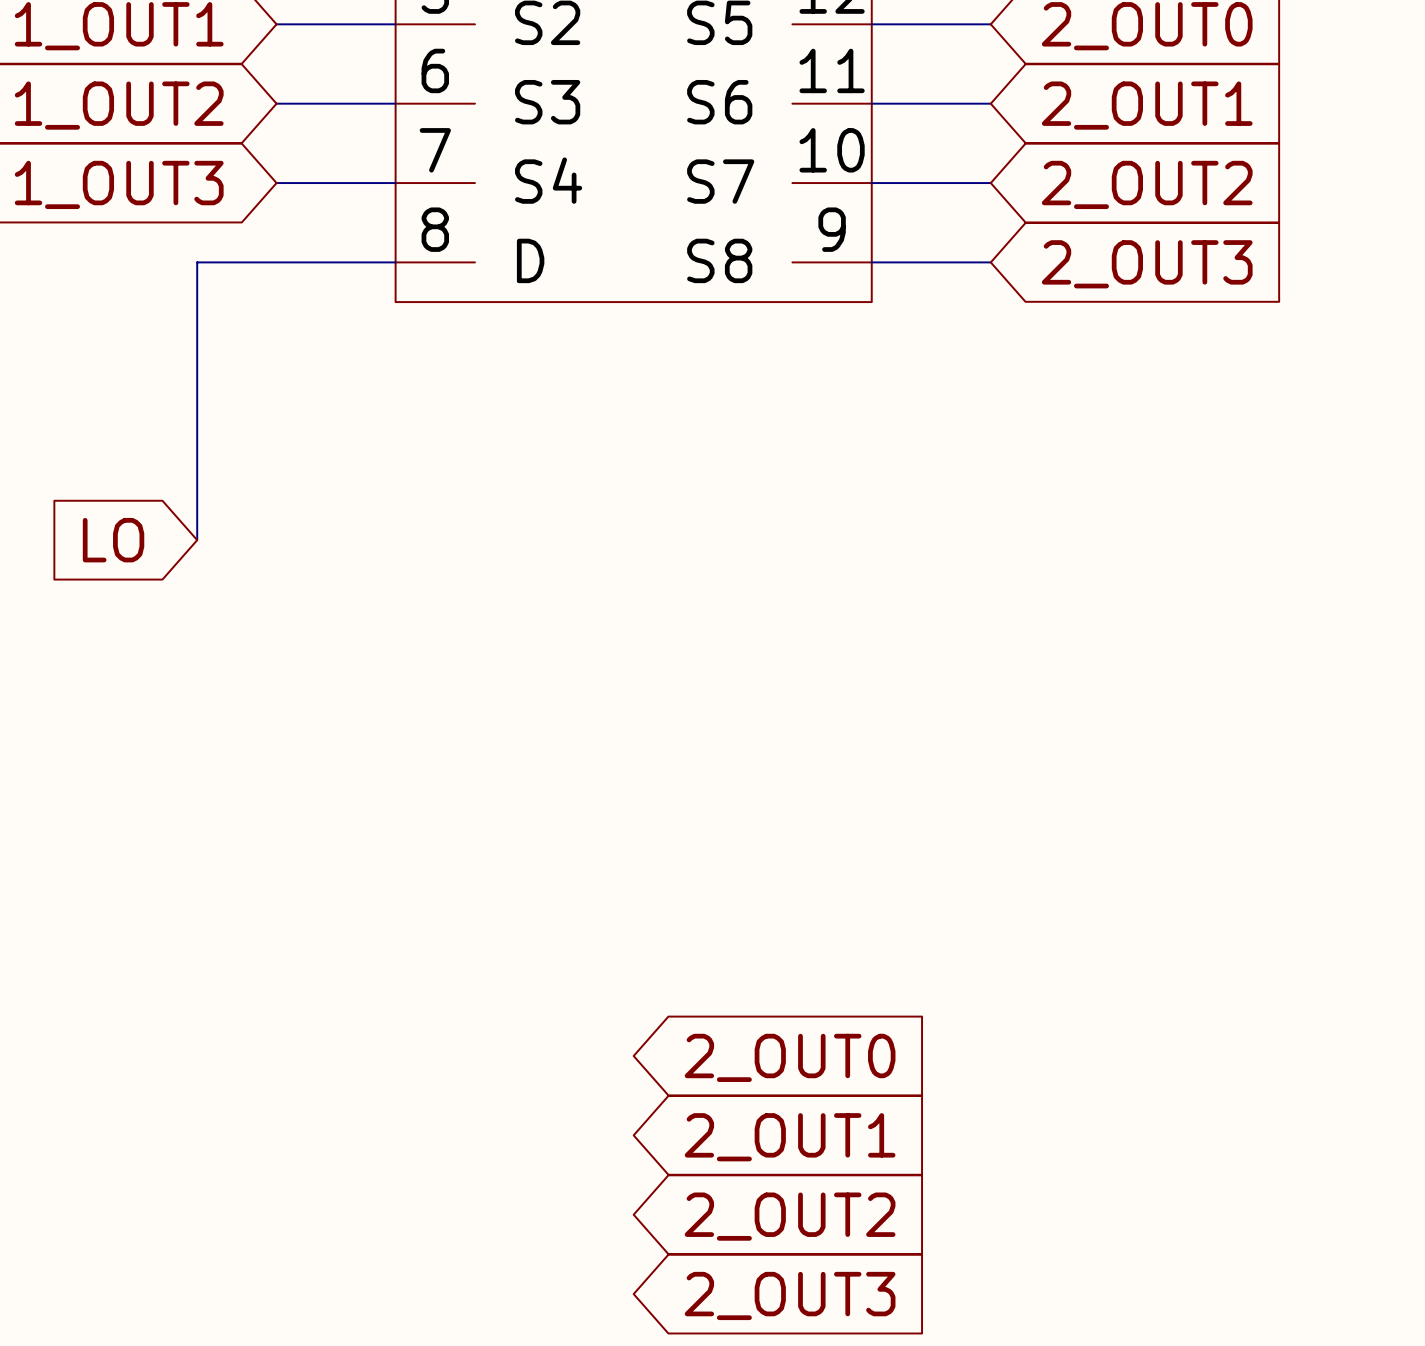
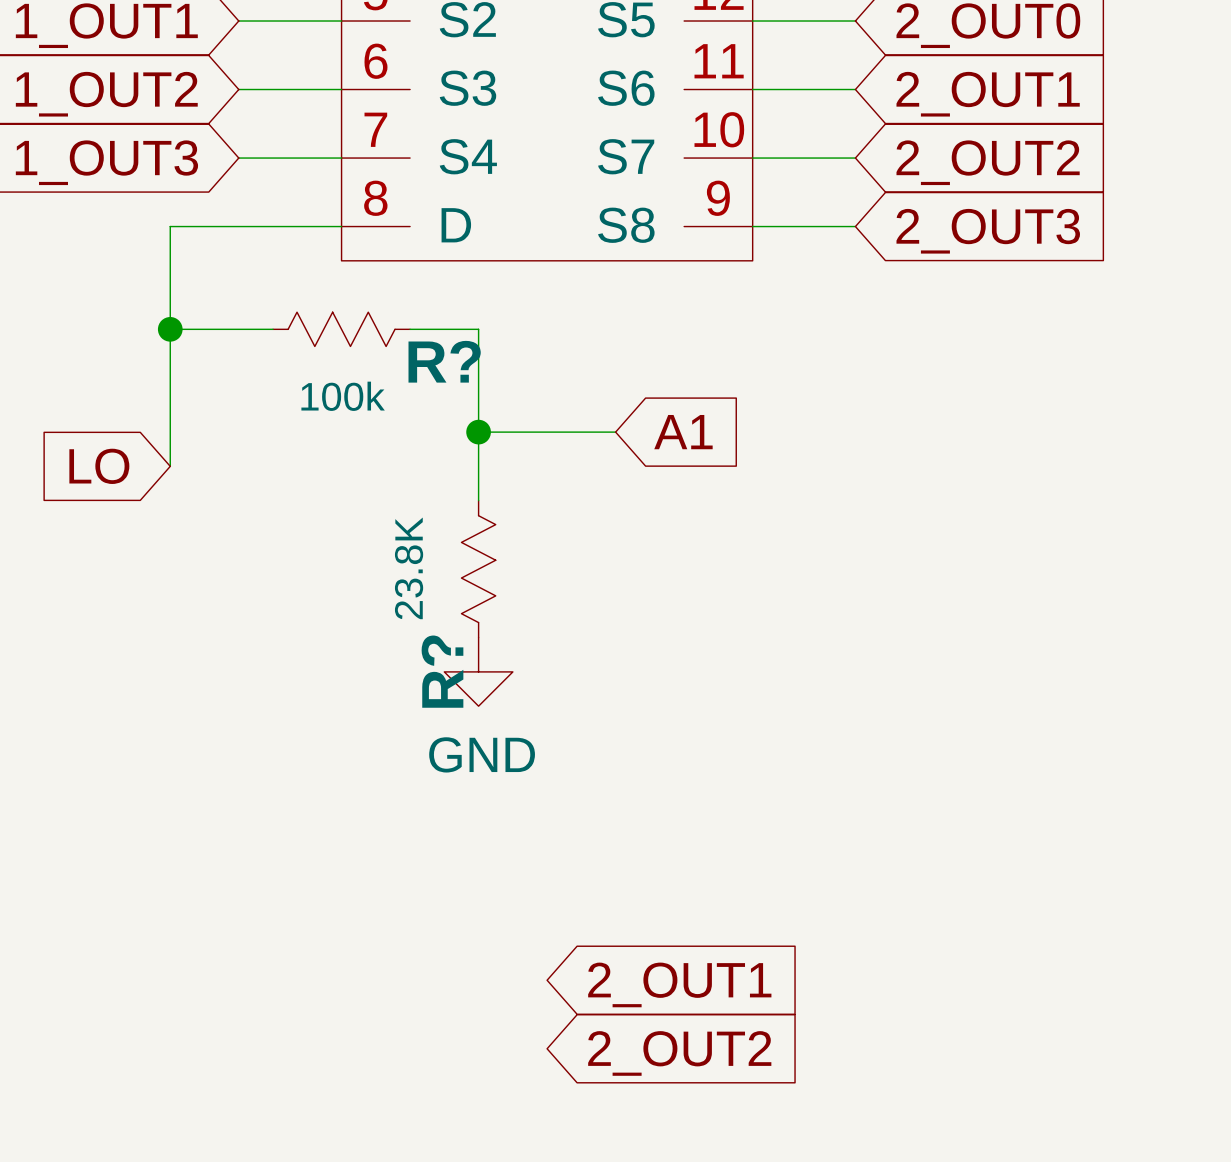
wire: none -> (170, 329) (273, 329)
junction: none -> (170, 329)
R?: none -> 100k (341, 329)
wire: none -> (410, 329) (478, 329) (478, 500)
wire: none -> (478, 432) (615, 432)
junction: none -> (478, 432)
global label: none -> A1 (683, 432)
R?: none -> 23.8K (478, 569)
power symbol: none -> GND (478, 671)
global label: 2_OUT0 (790, 1057) -> none
global label: 2_OUT3 (790, 1295) -> none

